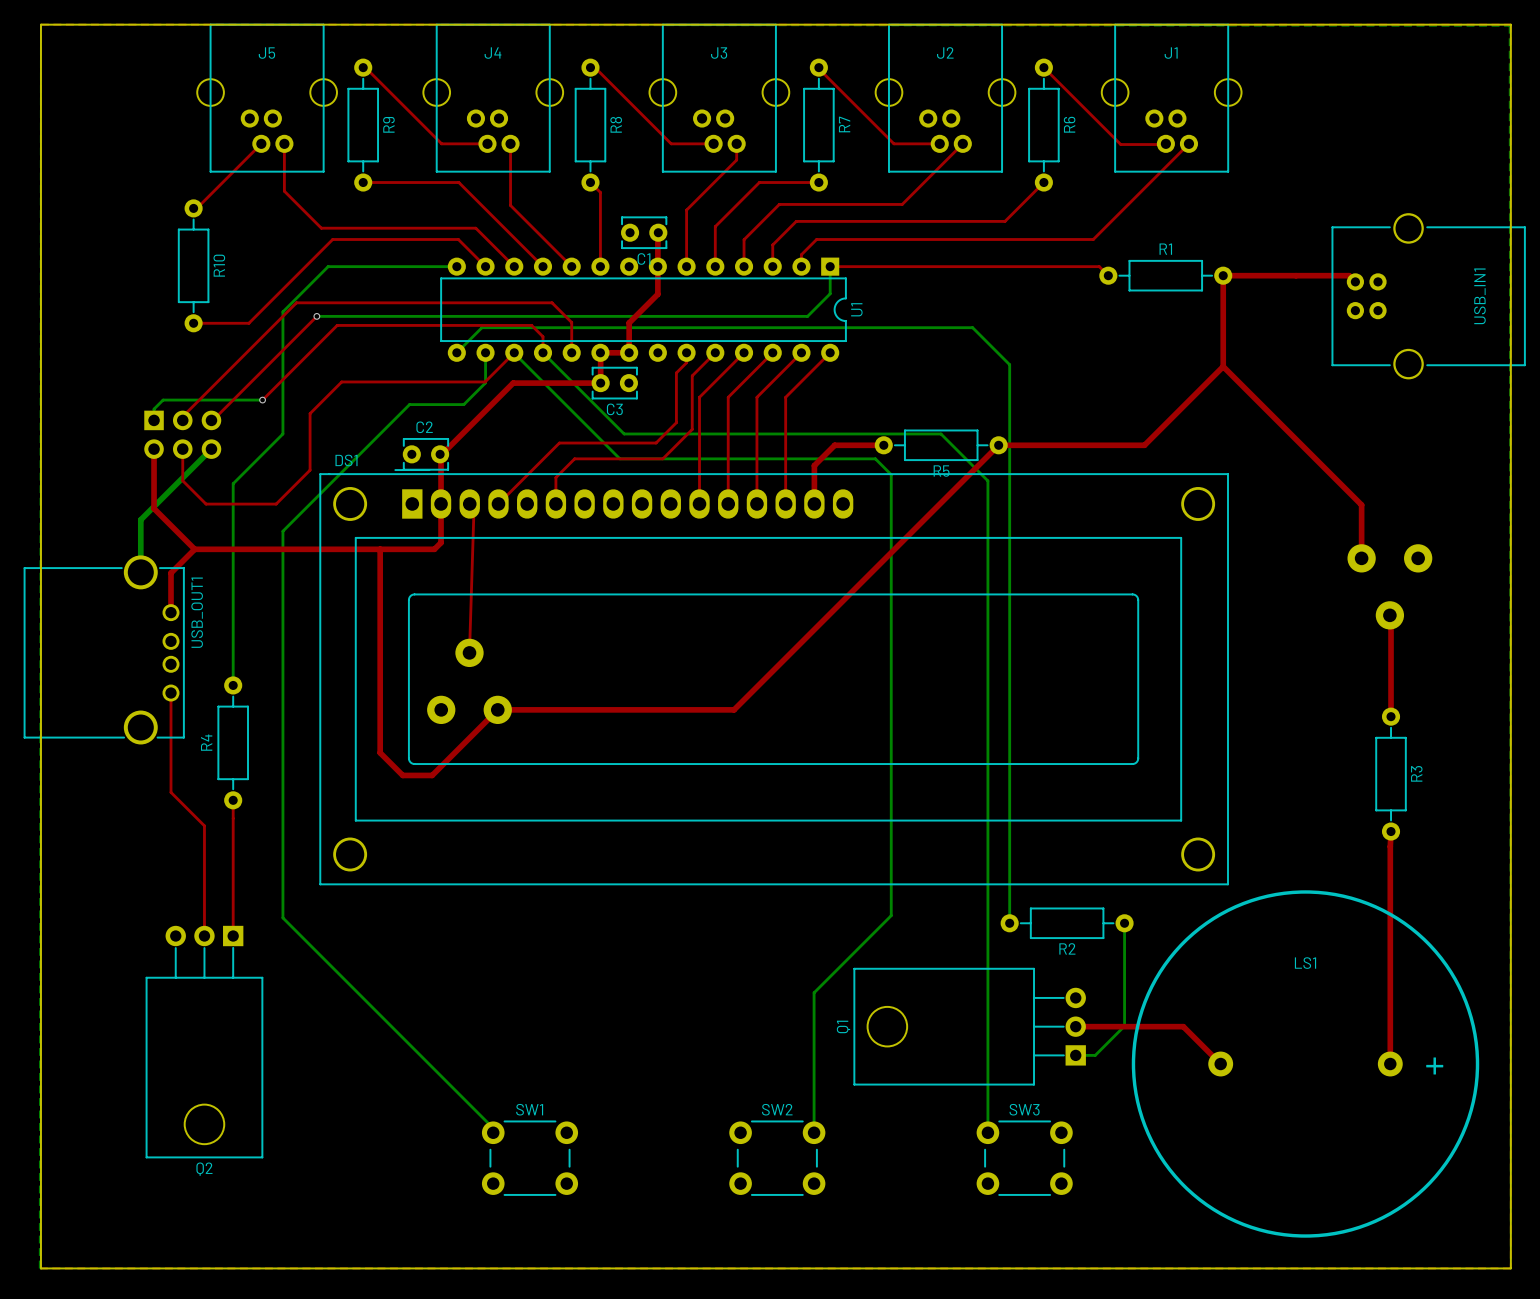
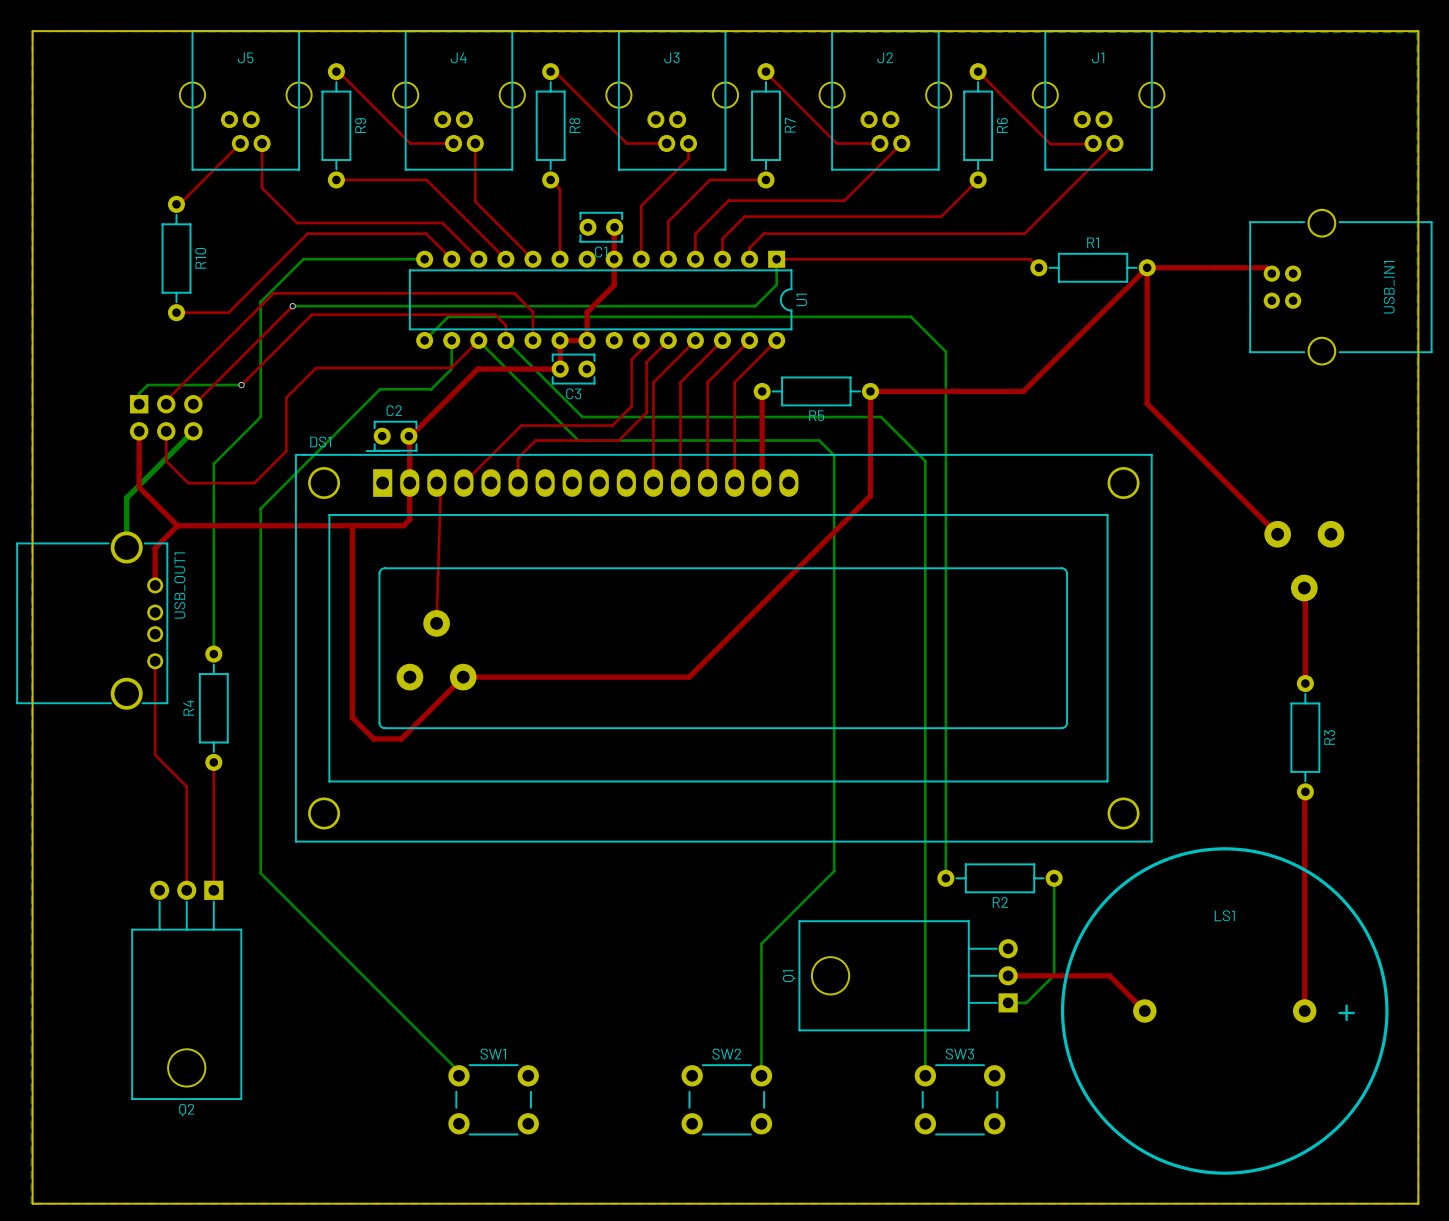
top track: none -> (1147, 353) (1147, 403) (1277, 534)
top track: (883, 445) (834, 445) (814, 465) (814, 503) -> (762, 391) (761, 483)
R5 position: (941, 445) -> (816, 391)
top track: (1361, 558) (1361, 504) (1223, 366) (1144, 445) (998, 445) (734, 709) -> (1147, 267) (1023, 391) (870, 391) (870, 495) (689, 677) (686, 677)

